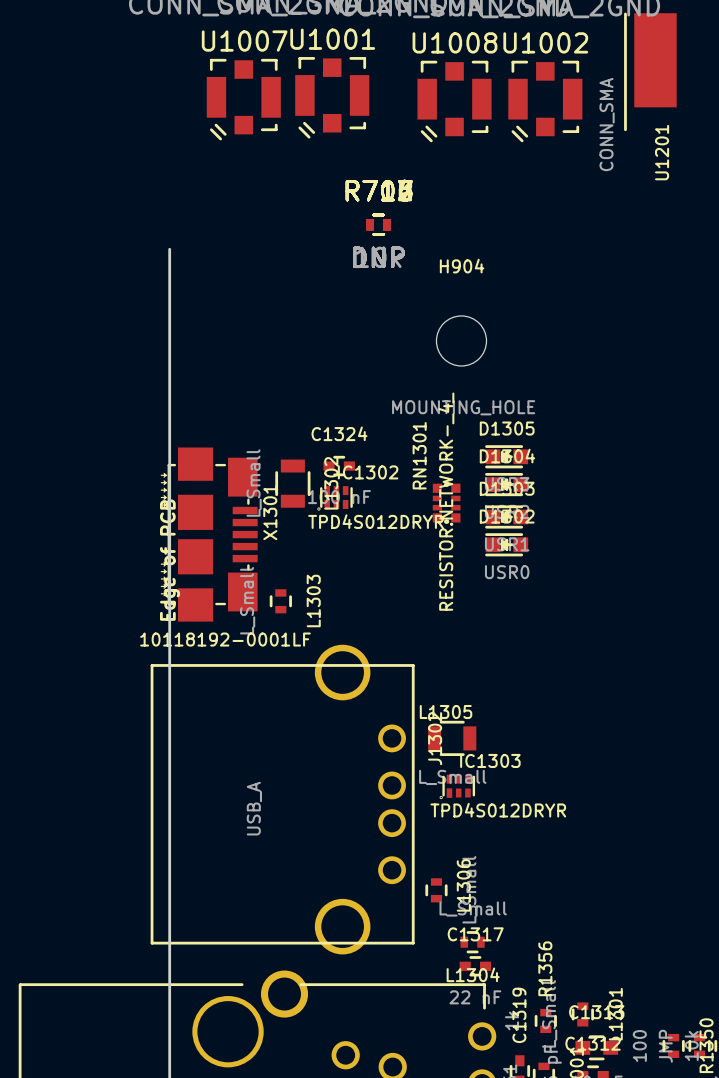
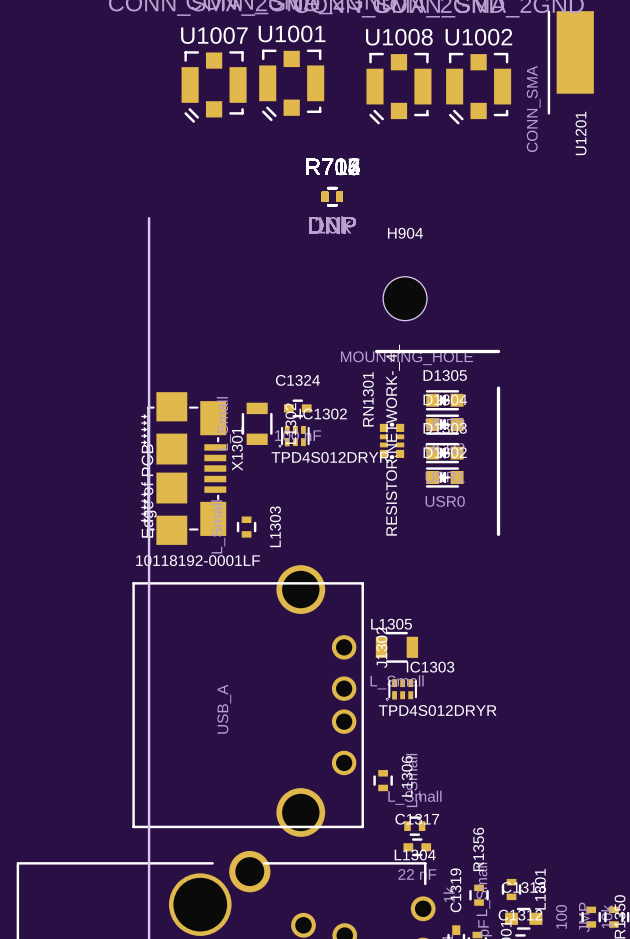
line: none -> (376, 351) (498, 351)
line: none -> (498, 388) (498, 534)

